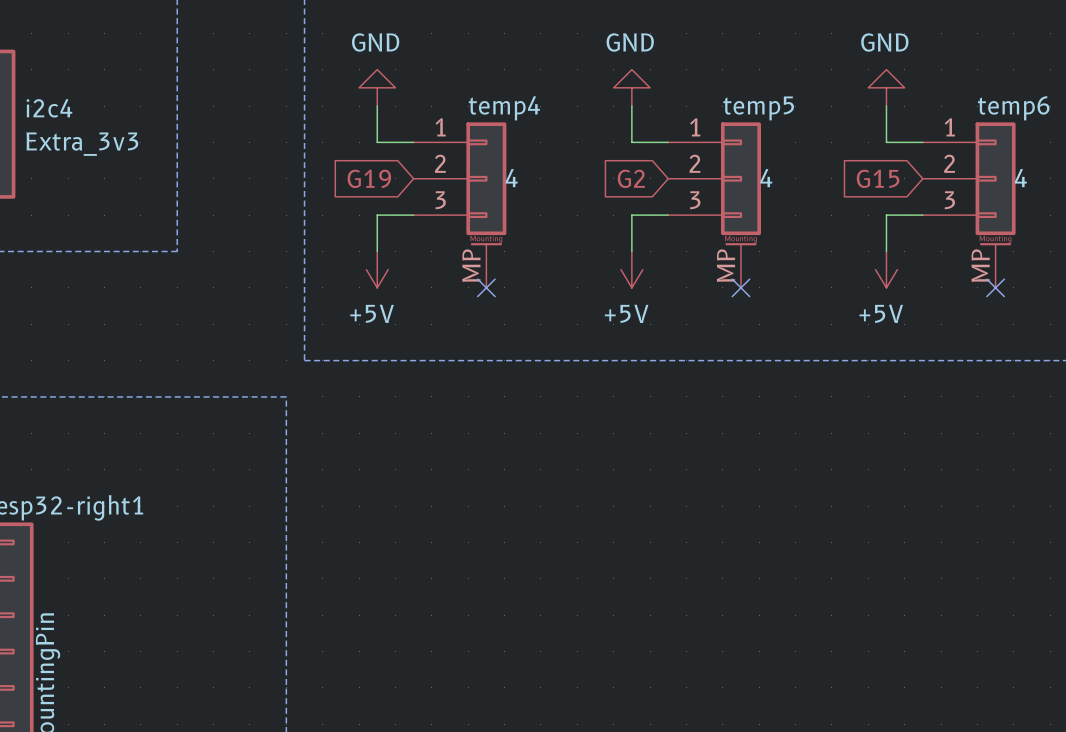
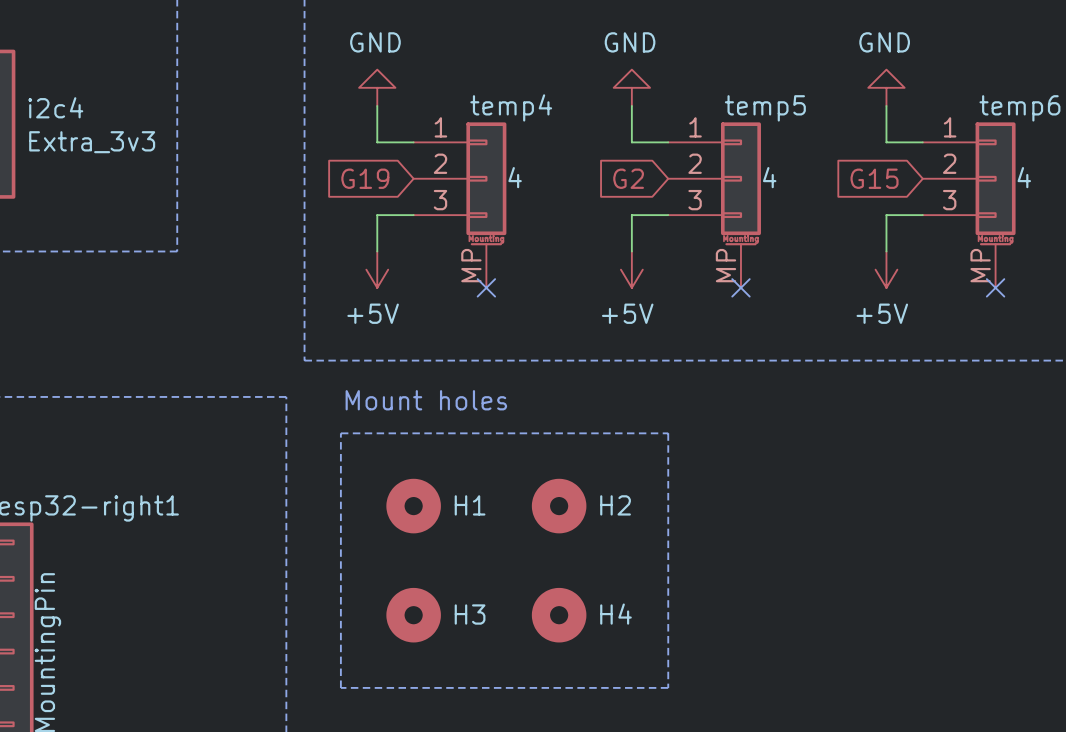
text: none -> Mount holes (426, 400)
line: none -> (340, 433) (668, 433) (668, 687) (340, 687) (340, 433)
H1: none -> (413, 506)
H2: none -> (559, 506)
H3: none -> (413, 615)
H4: none -> (559, 615)

